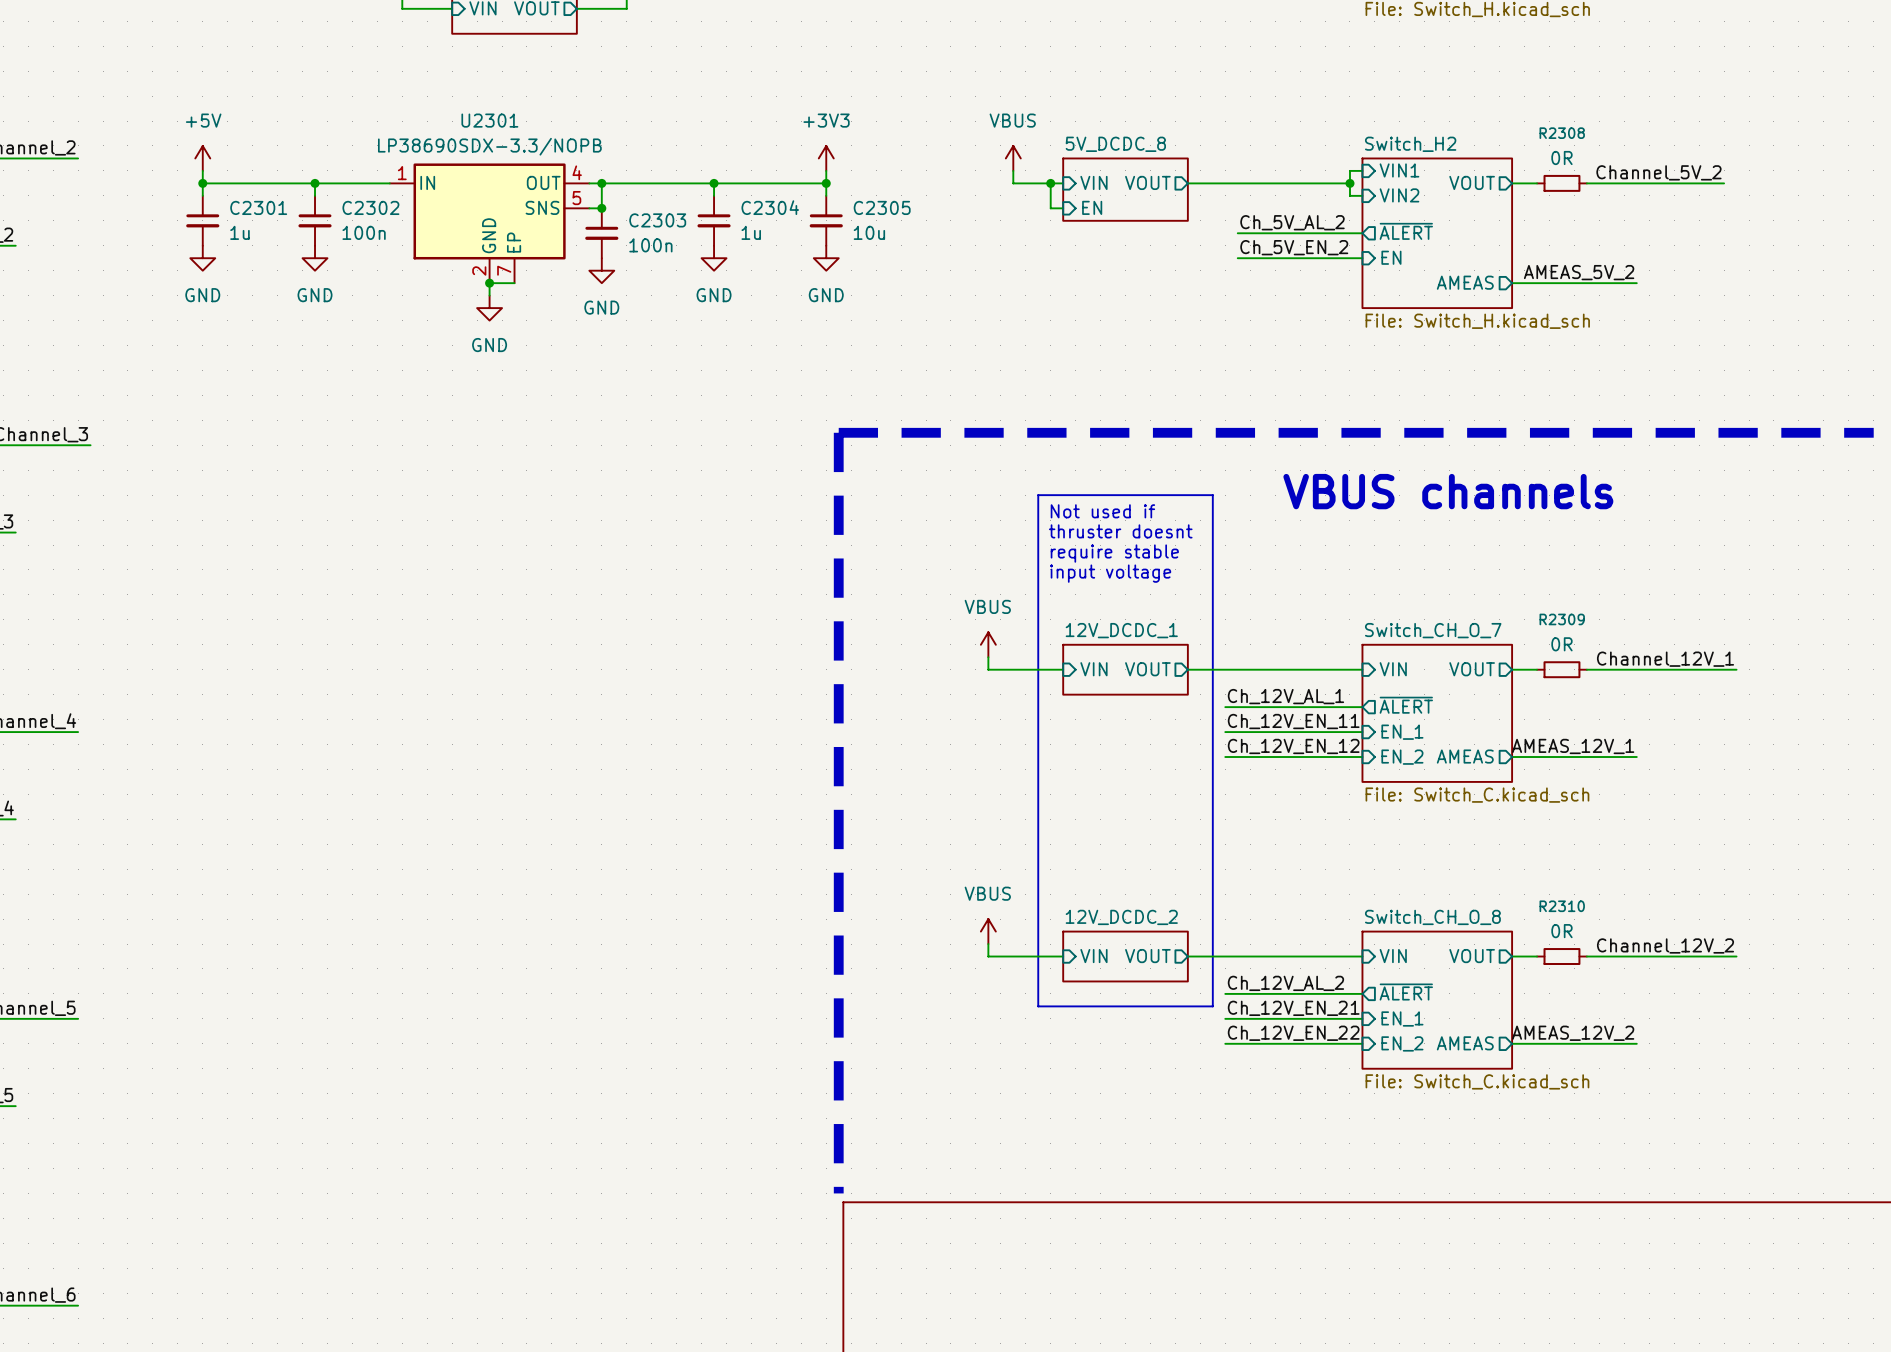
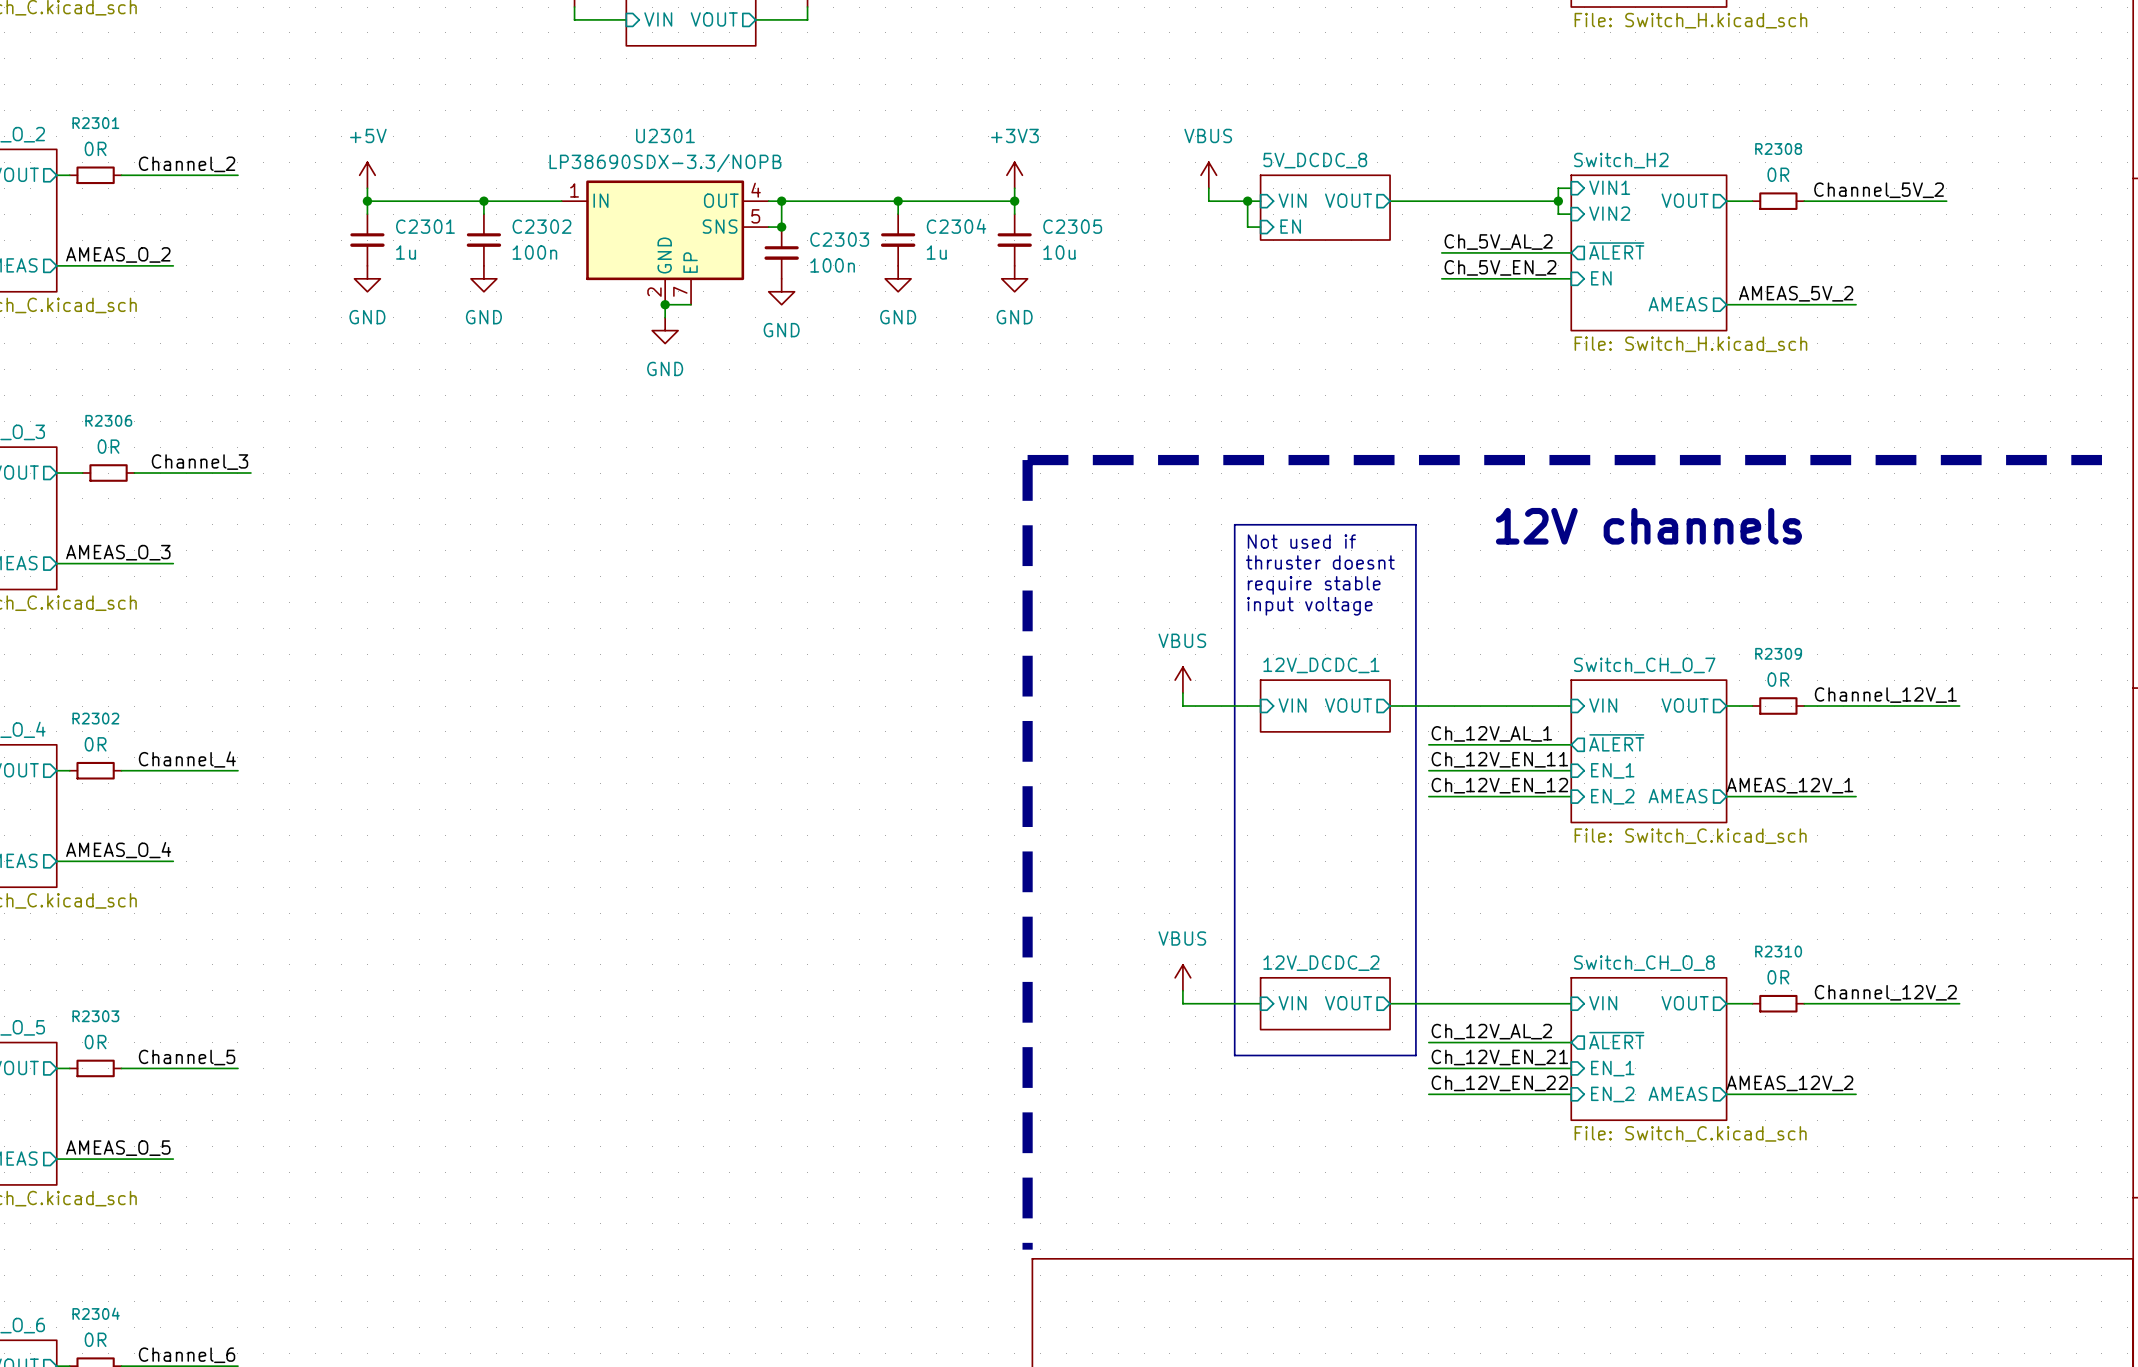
text: VBUS channels (1448, 491) -> 12V channels (1648, 526)

